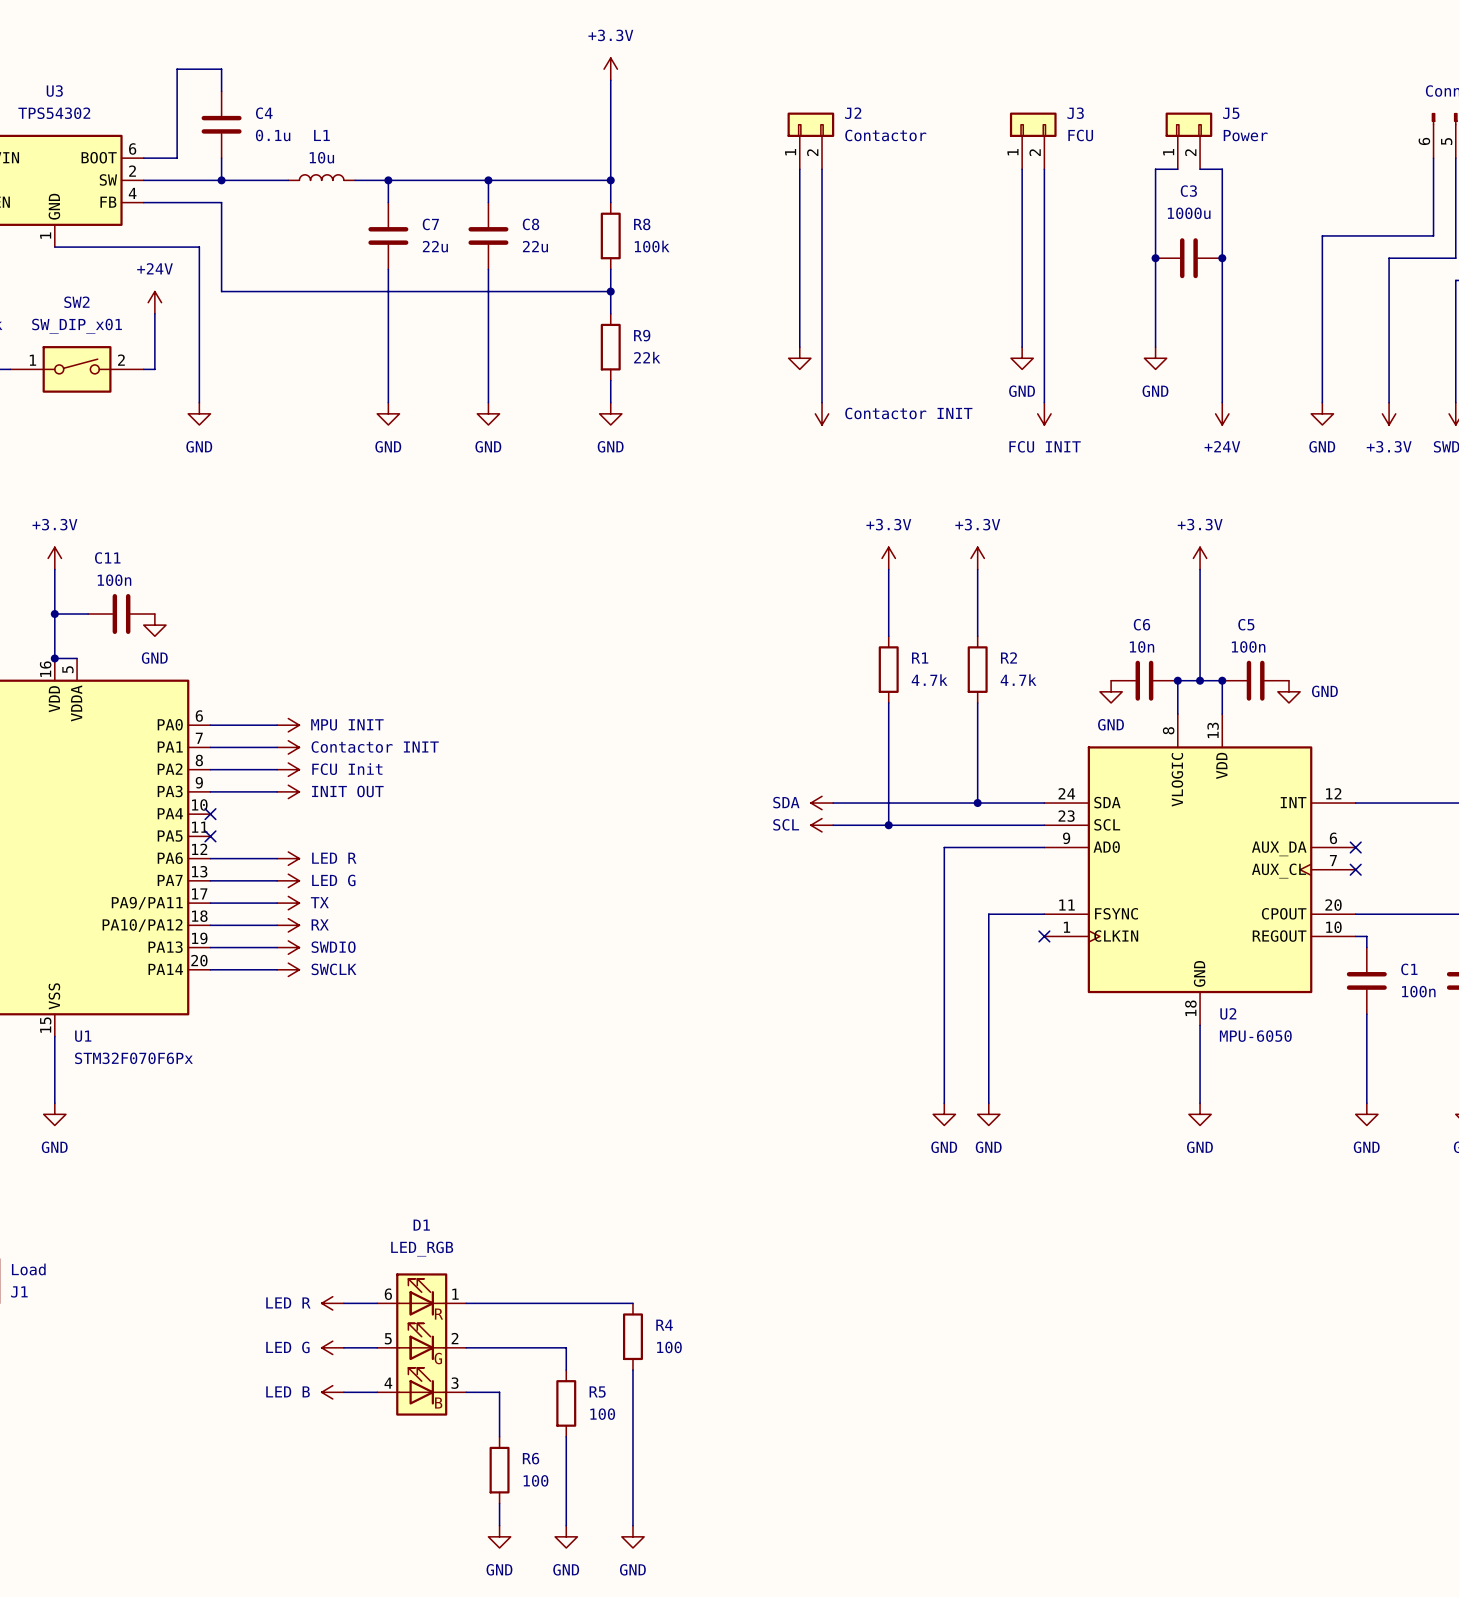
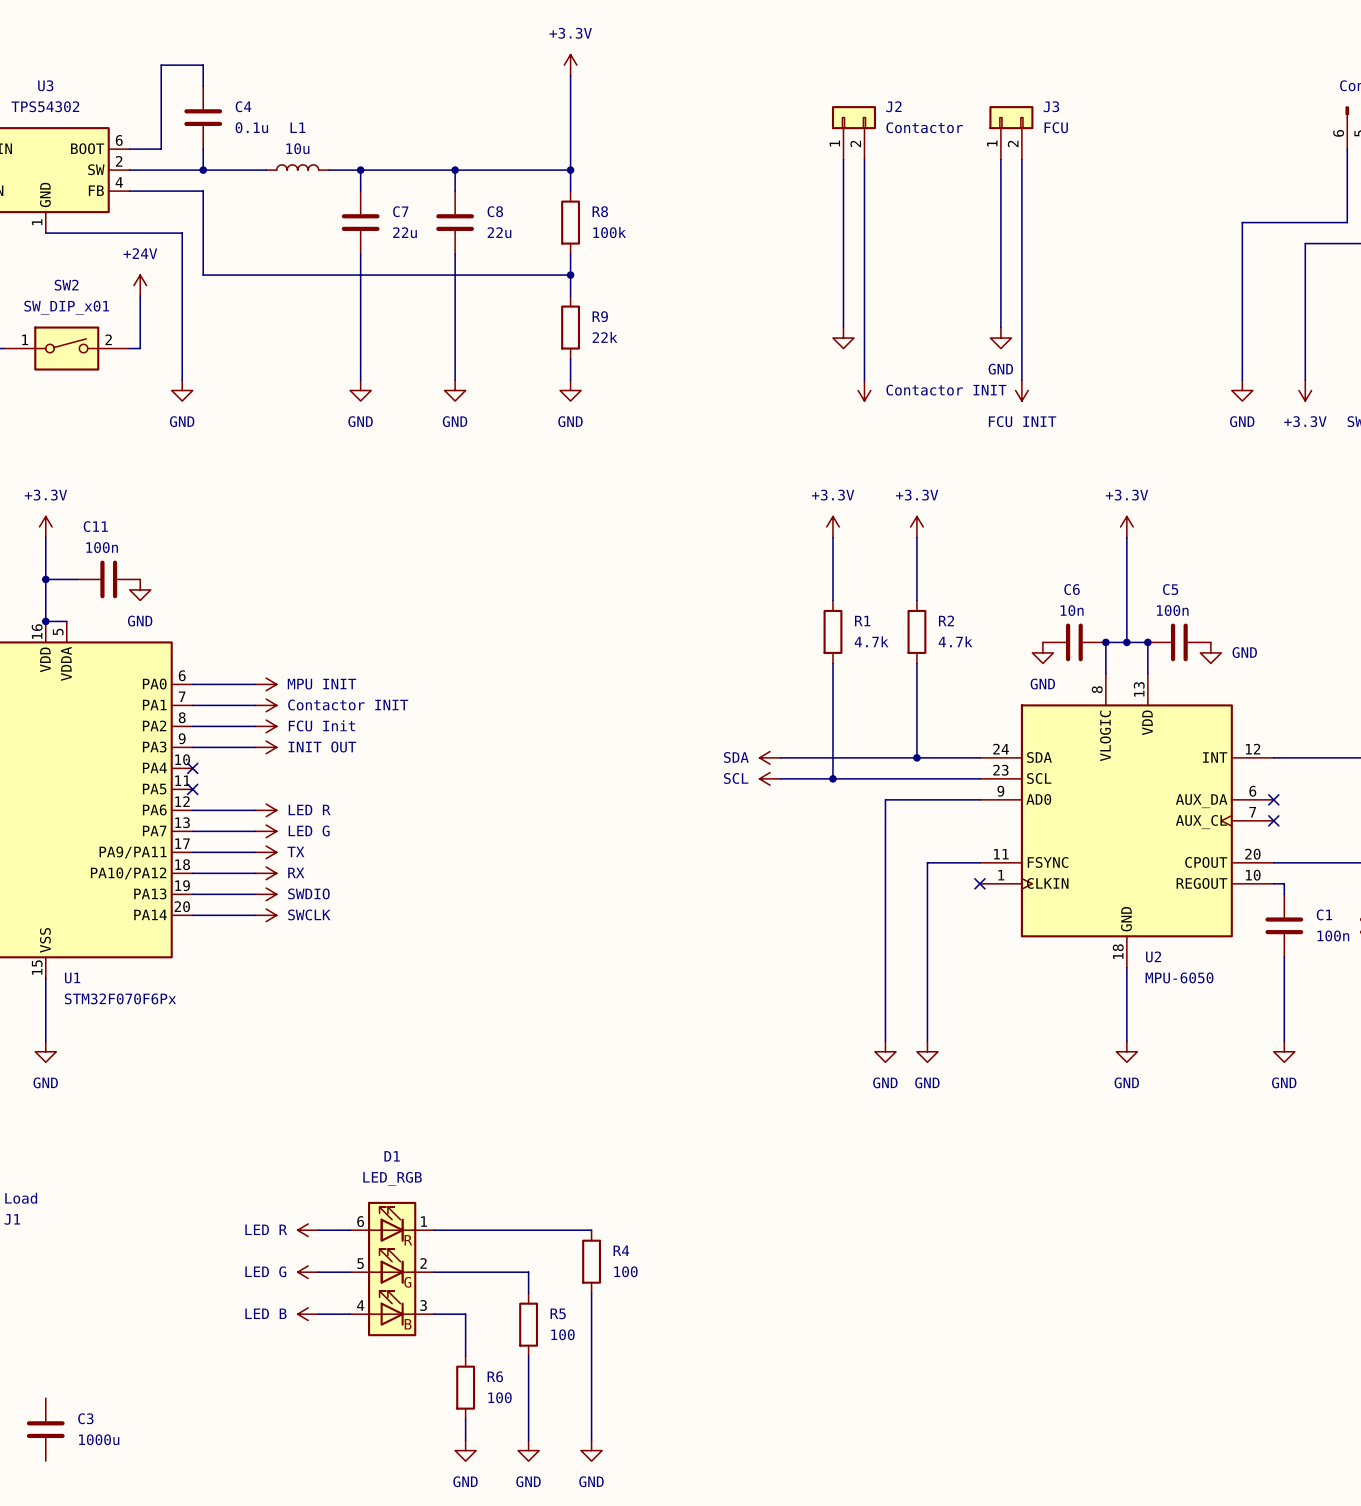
J2 position: (810, 140) -> (853, 132)
J3 position: (1033, 140) -> (1011, 132)
J5: Power (1188, 140) -> none
wire: (799, 169) (799, 347) -> (843, 159) (843, 327)
wire: (822, 169) (822, 402) -> (864, 159) (864, 380)
wire: (1022, 169) (1022, 347) -> (1000, 159) (1000, 327)
wire: (1044, 169) (1044, 402) -> (1021, 159) (1021, 380)
wire: (1177, 169) (1155, 169) (1155, 347) -> none
wire: (1200, 169) (1222, 169) (1222, 402) -> none
C3 name position: C3 (1188, 191) -> C3 (85, 1418)
C3 value position: 1000u (1189, 213) -> 1000u (99, 1439)
junction: (1155, 258) -> none
C3 rotation: 0° (1188, 258) -> 90° clockwise (45, 1429)
C3 position: (1188, 258) -> (45, 1429)
junction: (1222, 258) -> none
power symbol position: (799, 358) -> (843, 338)
power symbol: GND (1022, 358) -> none
power symbol: none -> GND (1000, 338)
power symbol: GND (1155, 358) -> none
power symbol position: Contactor INIT (822, 413) -> Contactor INIT (864, 390)
power symbol position: FCU INIT (1044, 413) -> FCU INIT (1021, 390)
power symbol: +24V (1222, 413) -> none

